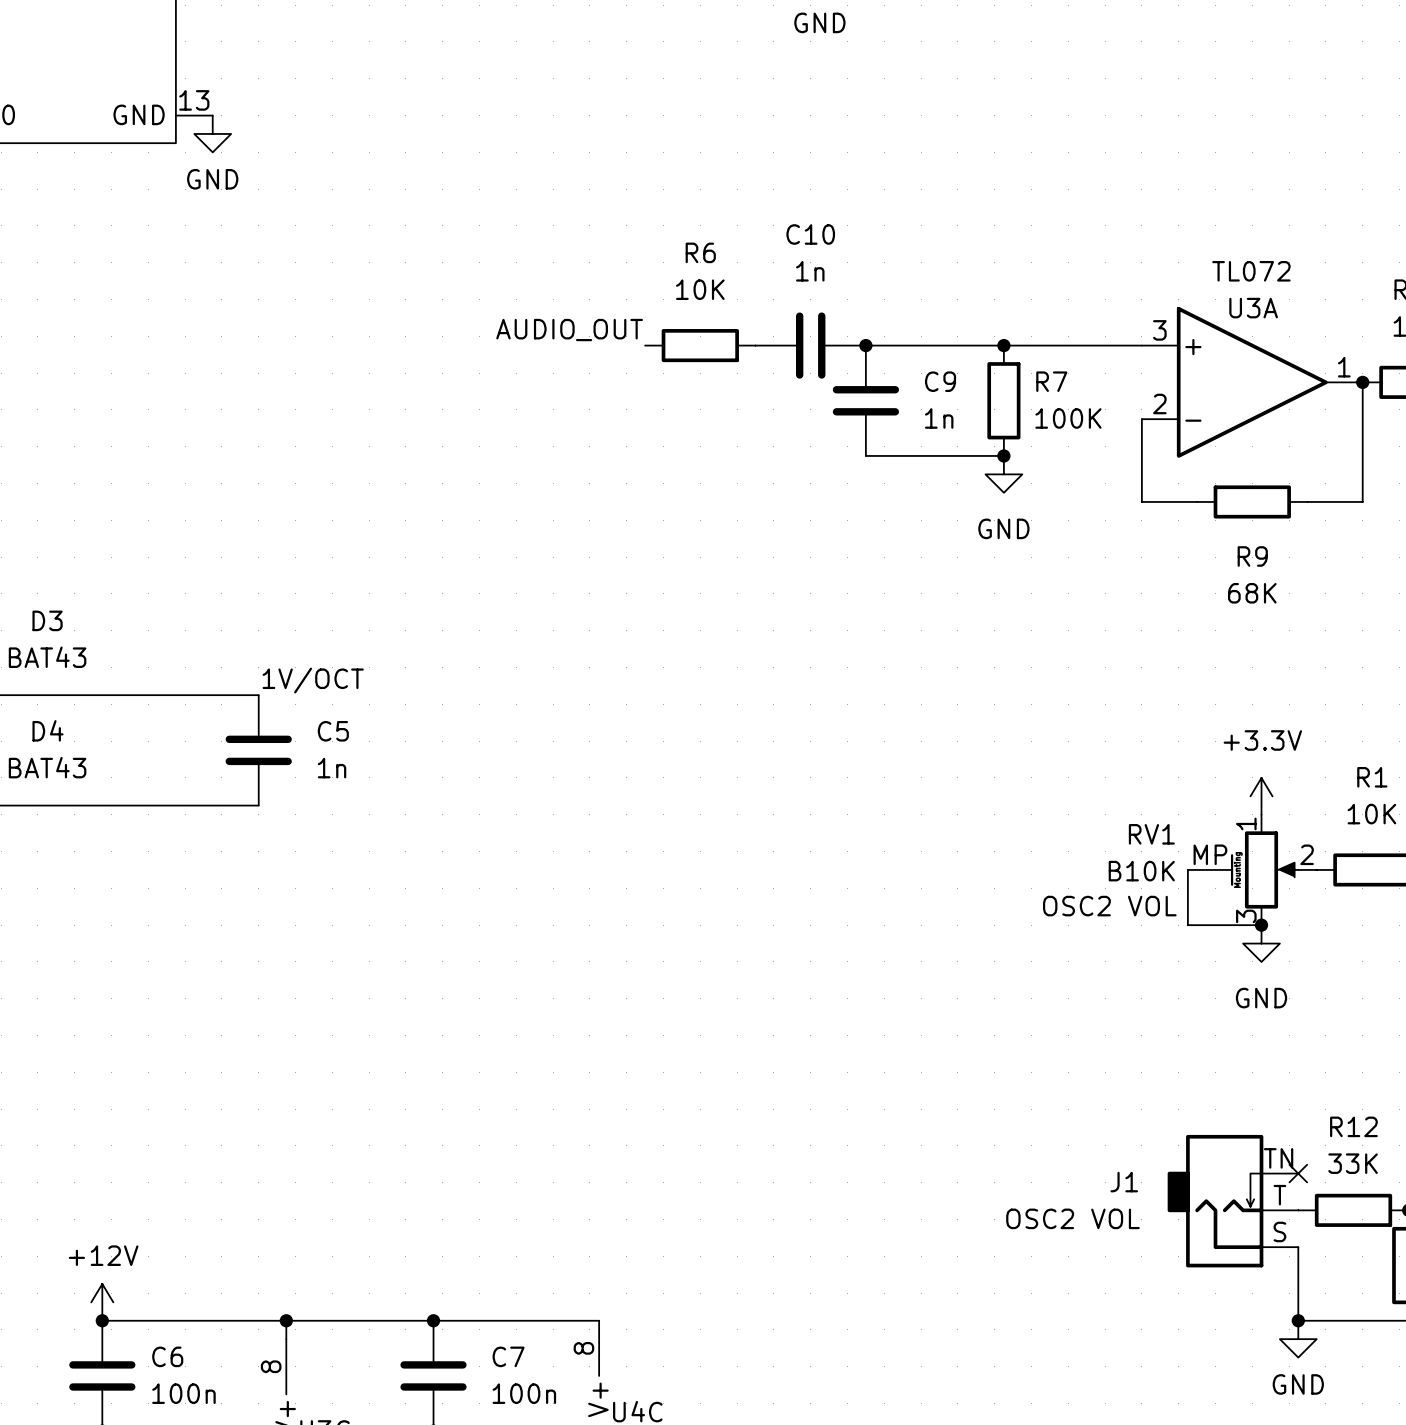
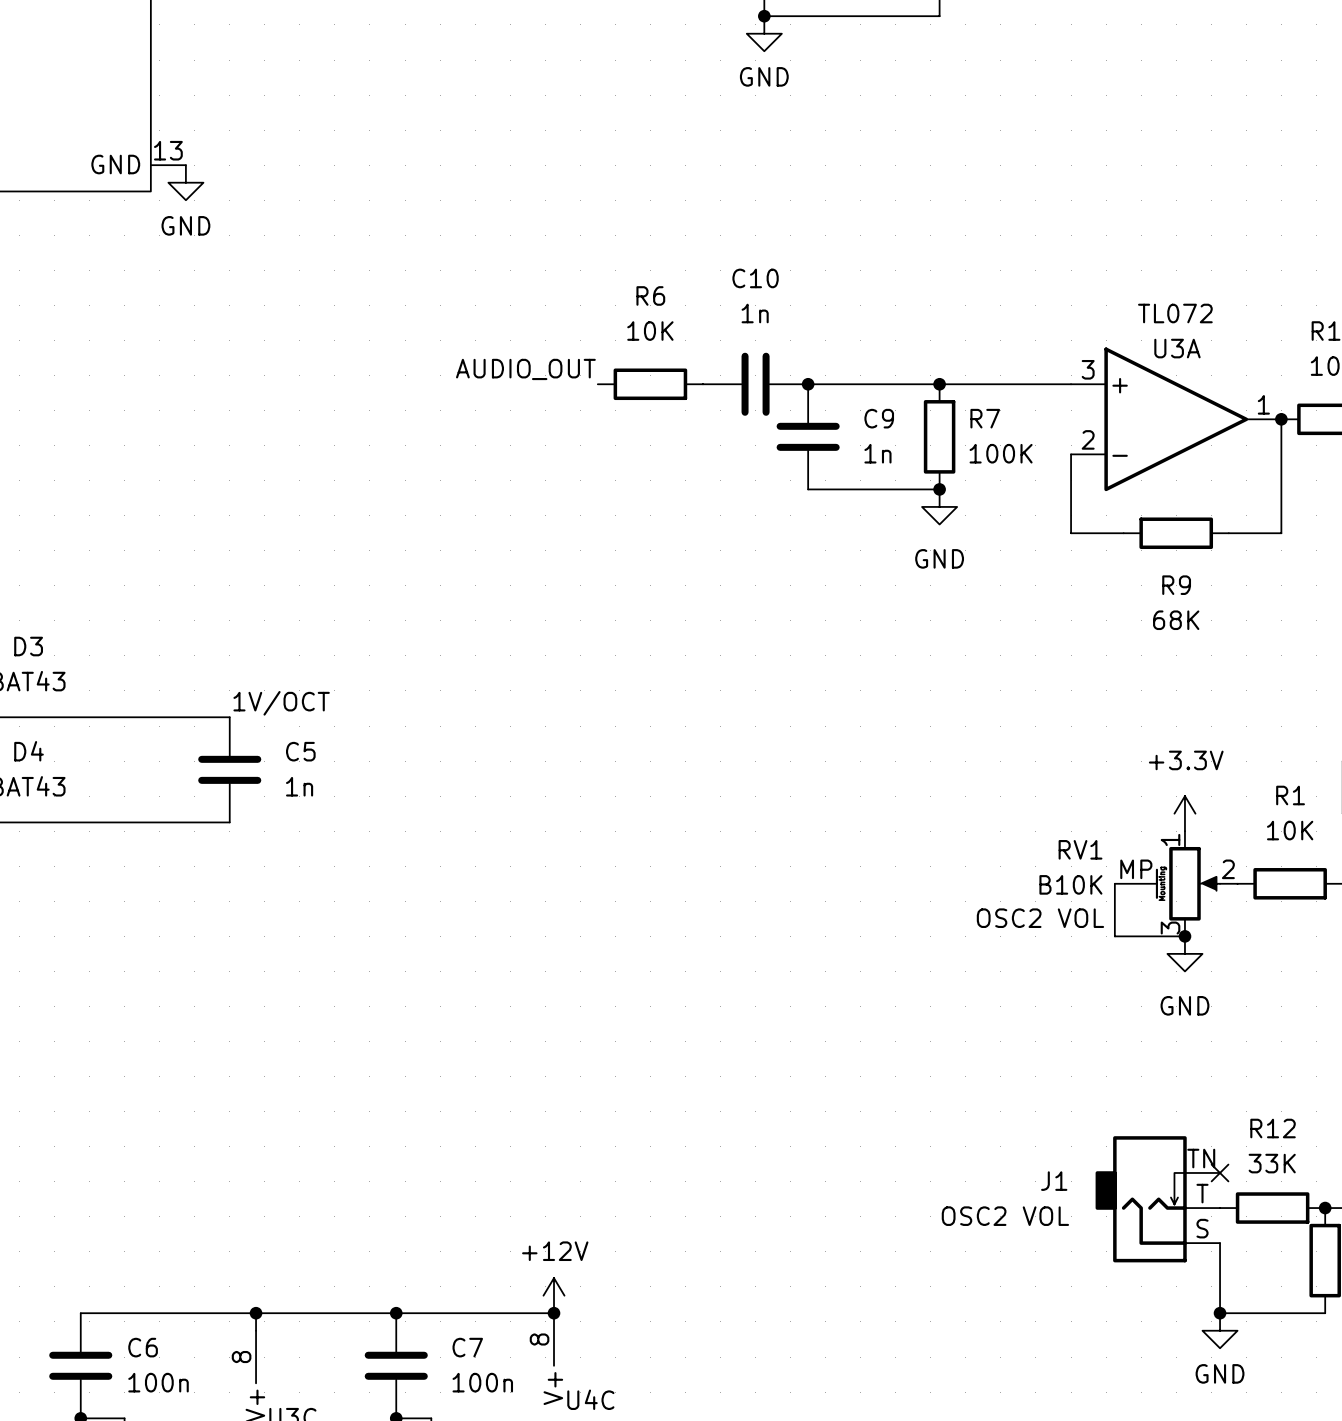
power symbol: +12V (102, 1302) -> none
power symbol: none -> +12V (554, 1295)
junction: (102, 1320) -> none
junction: none -> (554, 1313)

